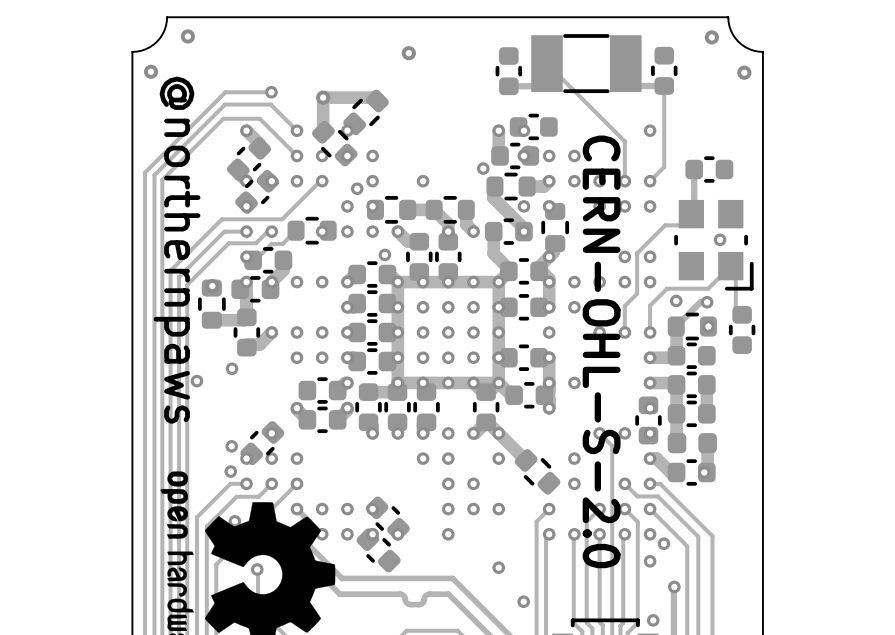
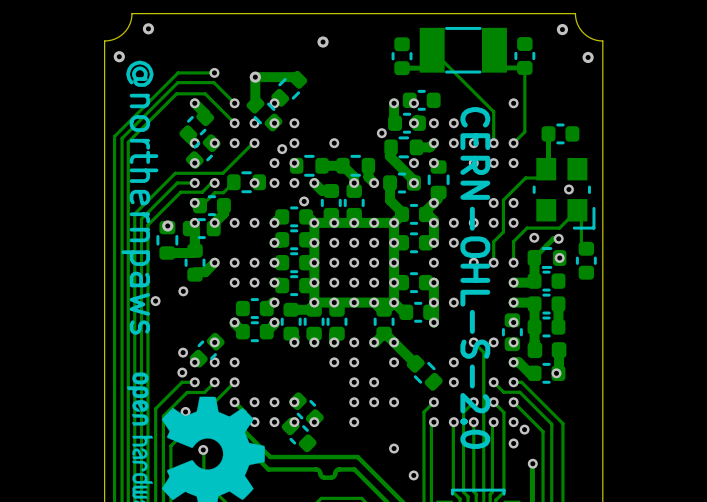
via: (653, 620) -> none

